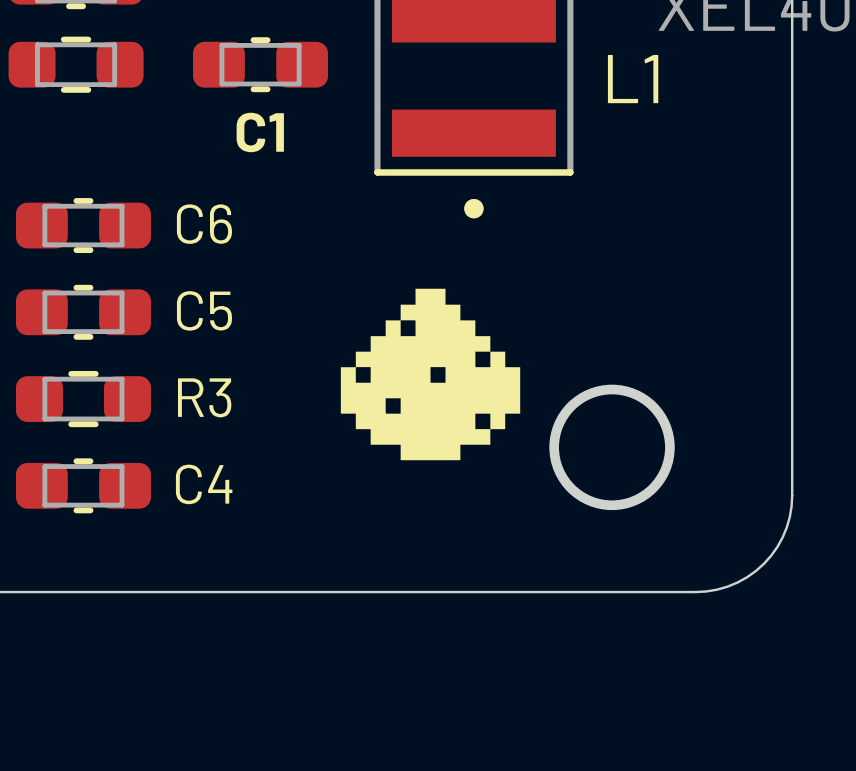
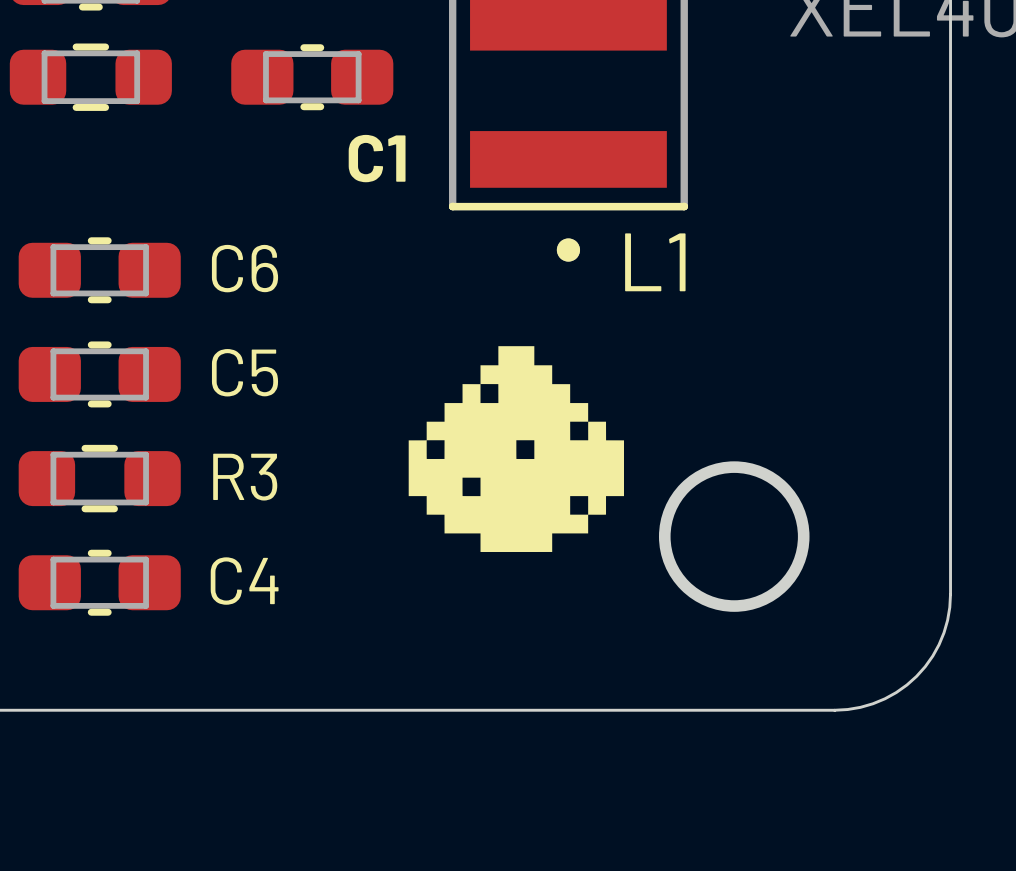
L1 name position: L1 (633, 79) -> L1 (655, 262)
C1 name position: C1 (260, 132) -> C1 (377, 158)

